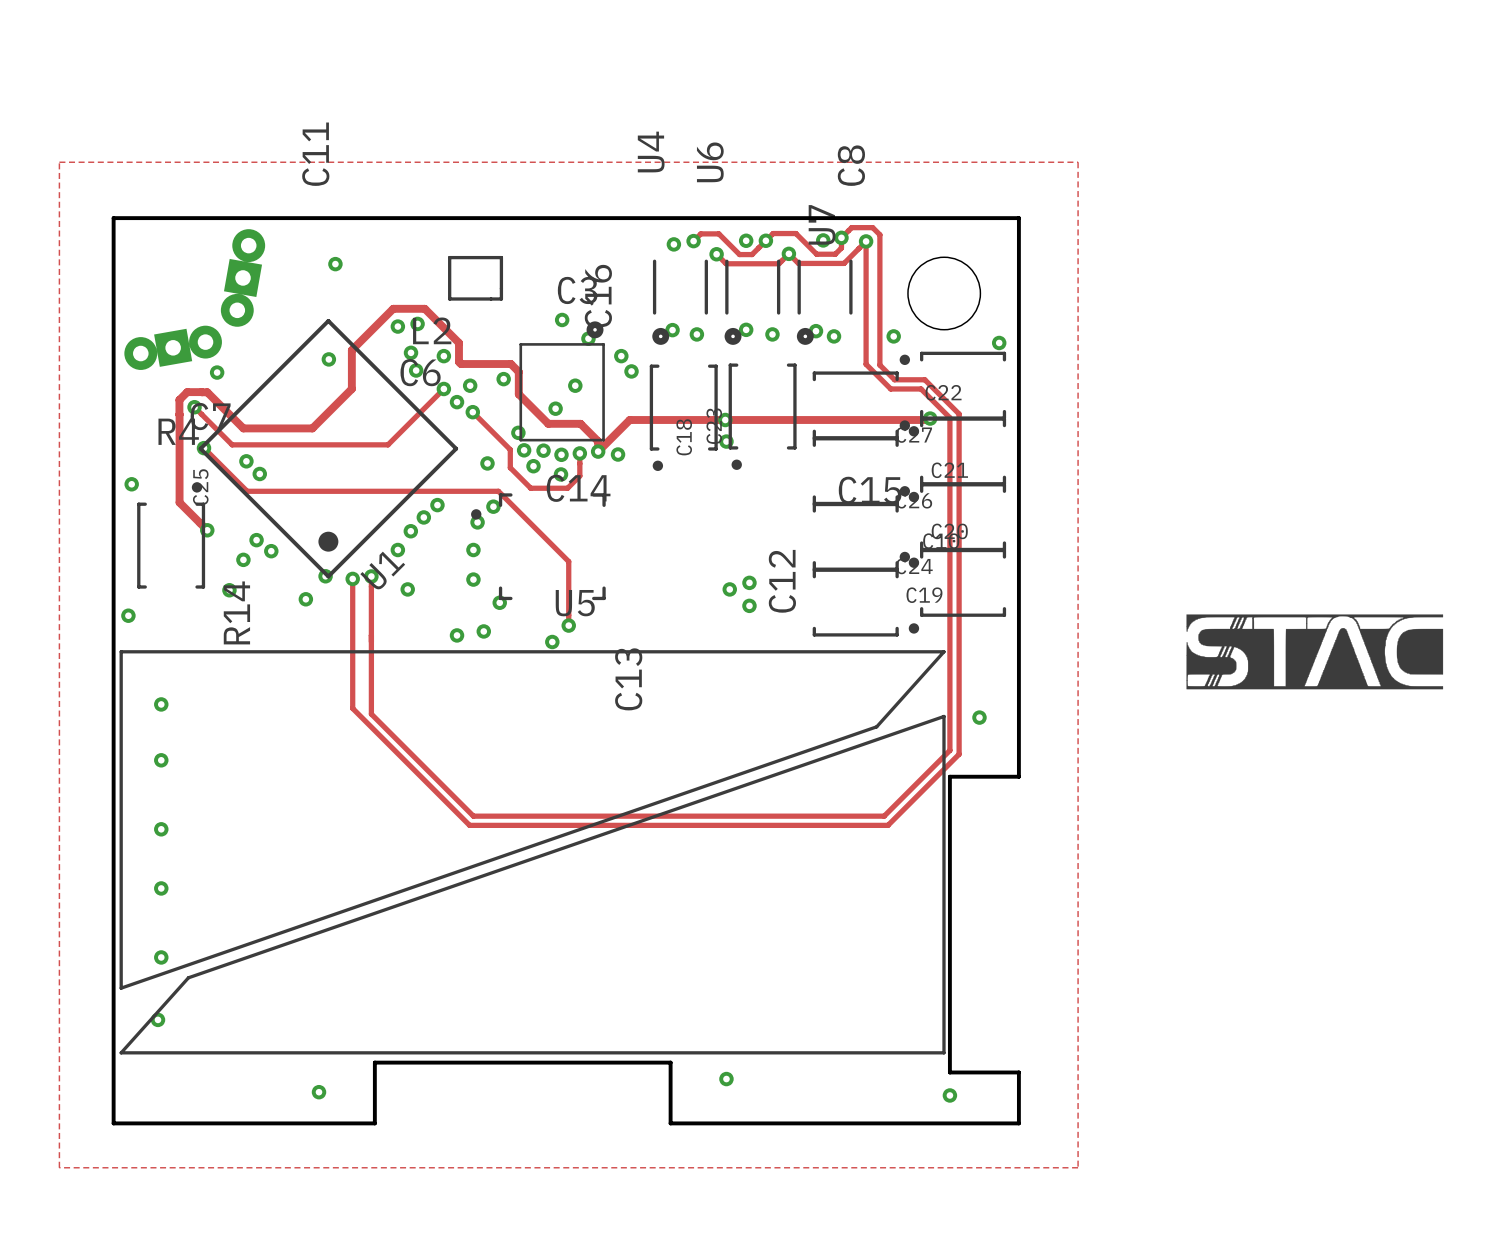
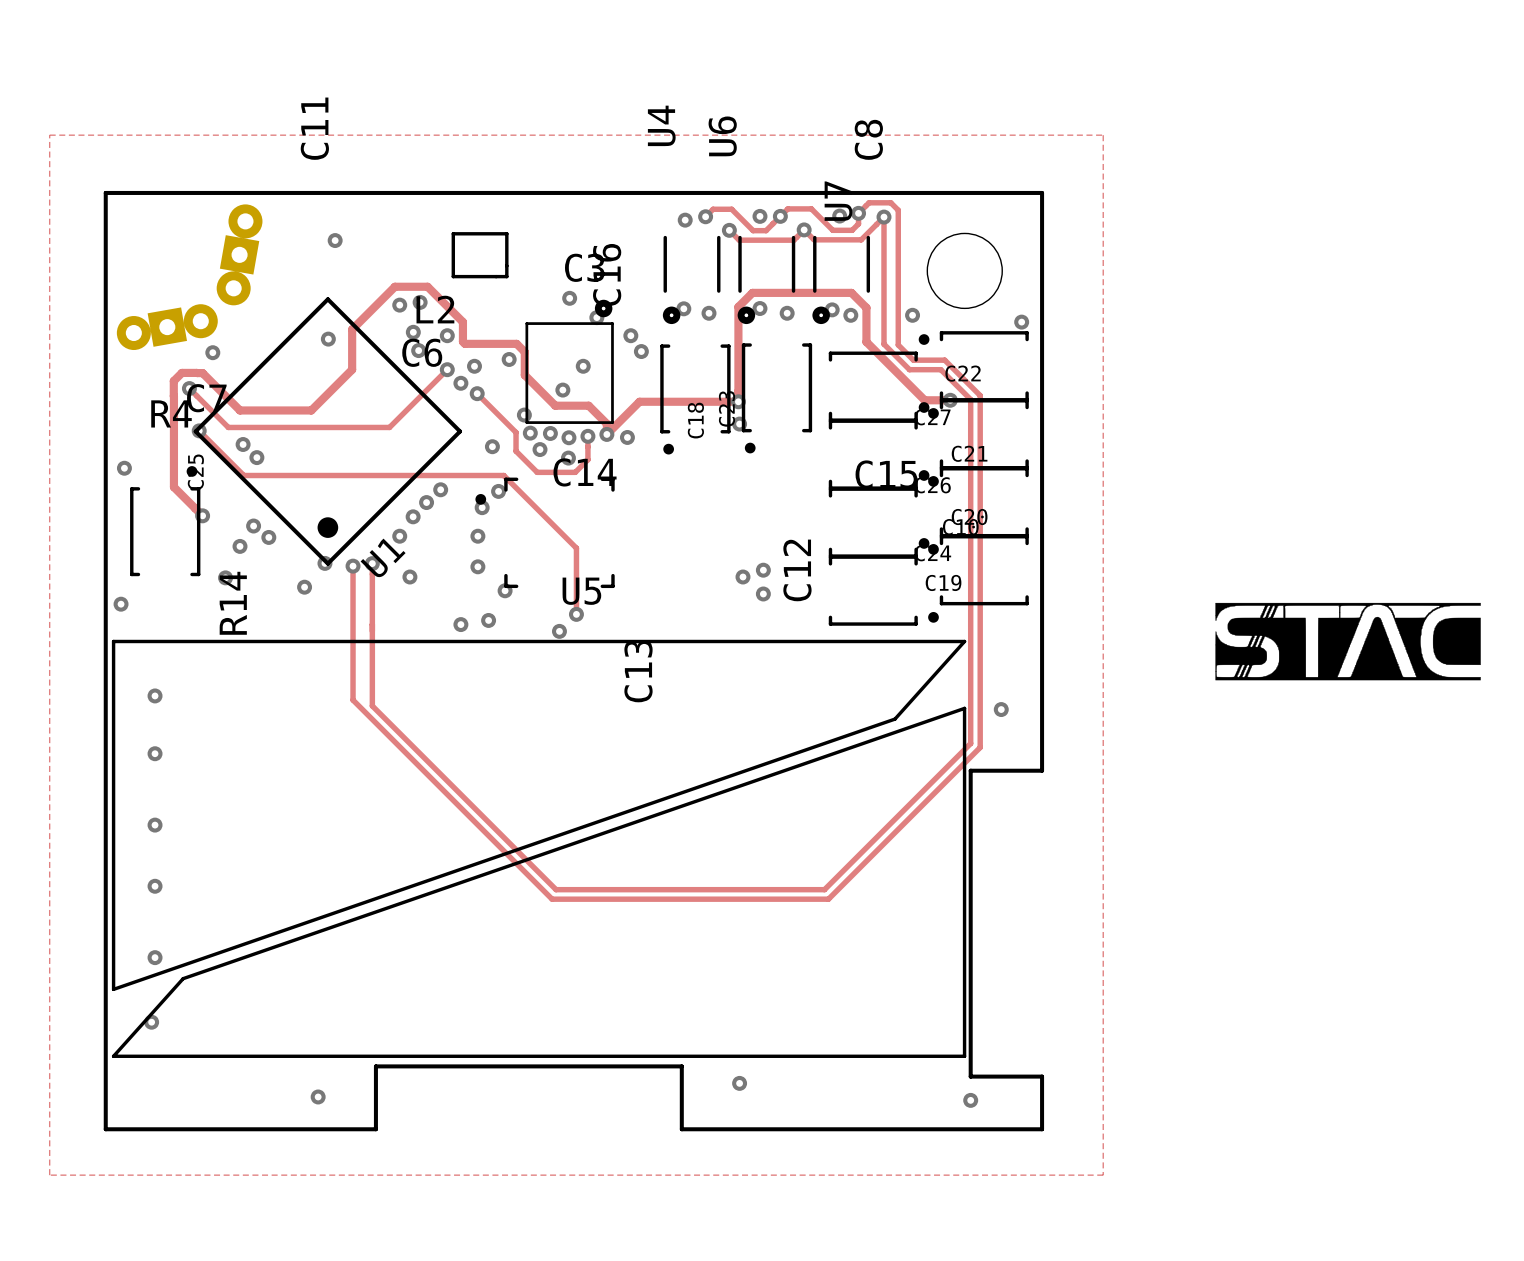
track: (725, 420) (928, 420) -> (738, 401) (738, 306) (752, 292) (851, 292) (866, 307) (866, 341) (924, 400) (950, 400)
track: (473, 816) (884, 816) -> (477, 811) (556, 889) (824, 889) (902, 811)
track: (469, 825) (888, 825) -> (473, 821) (552, 899) (828, 899) (906, 821)

